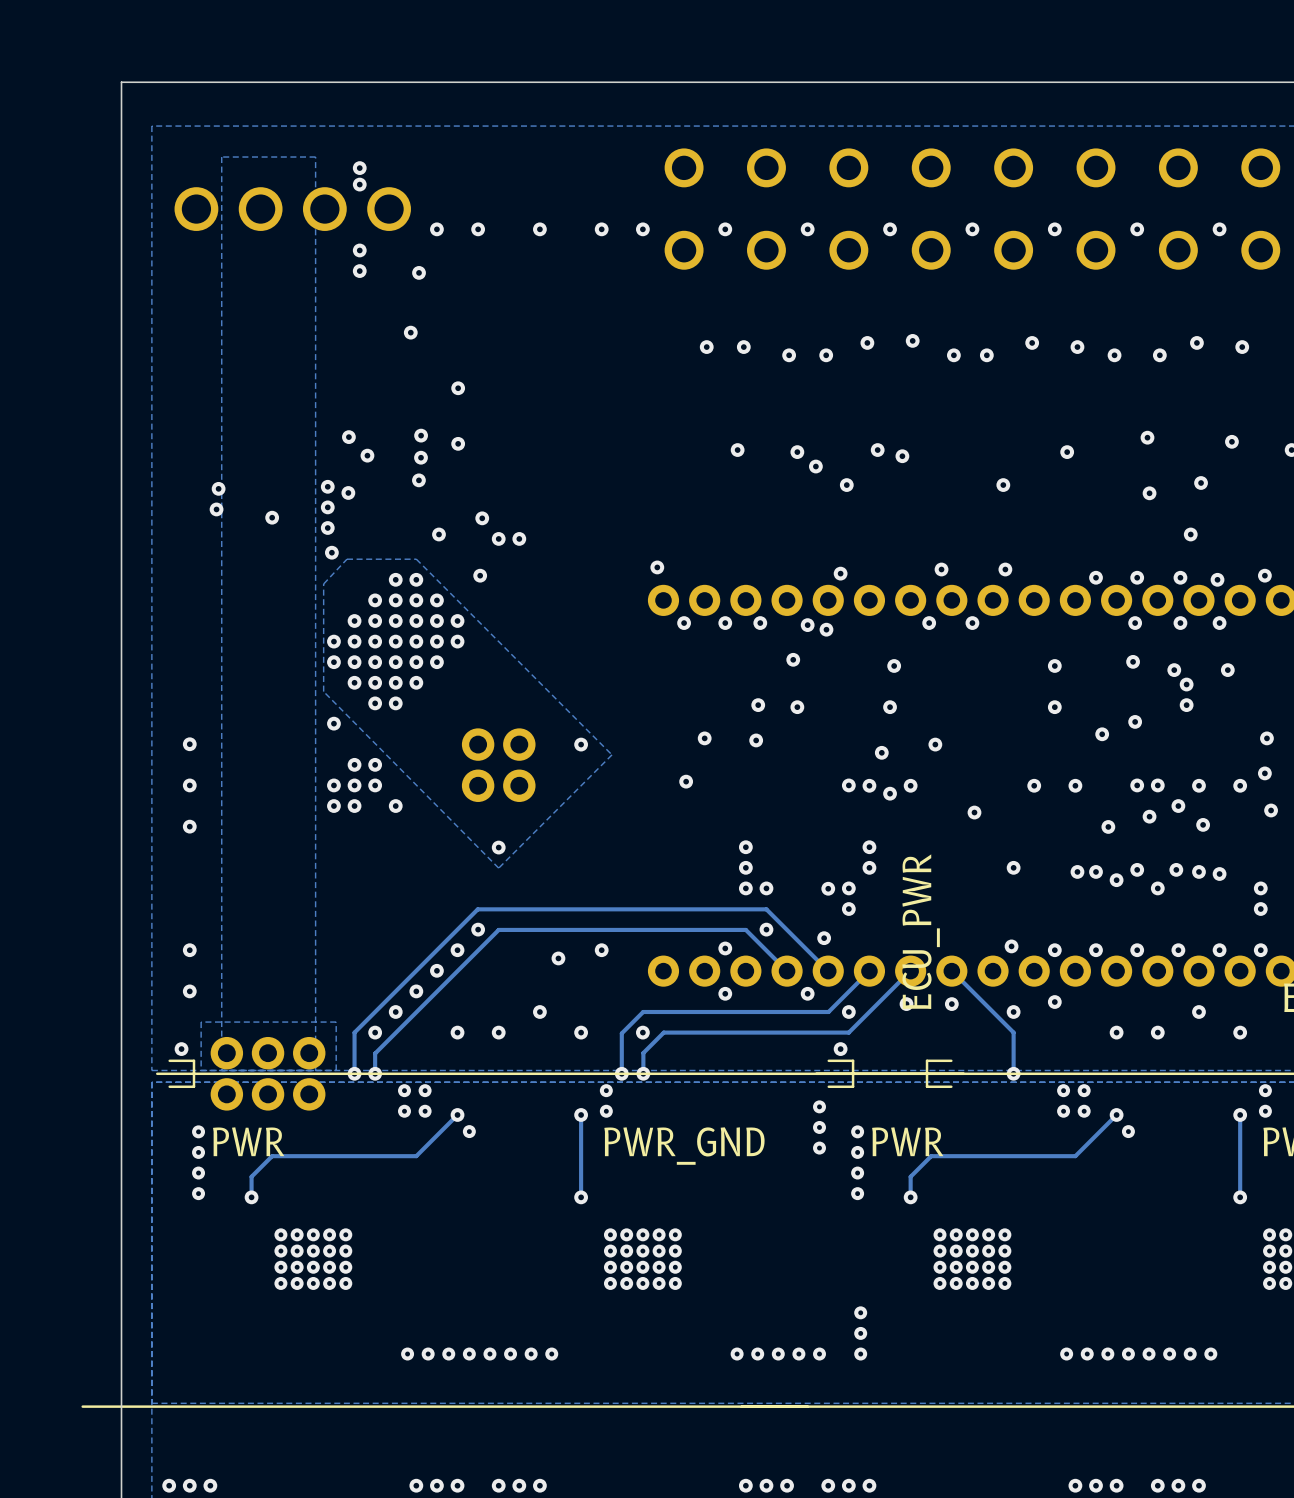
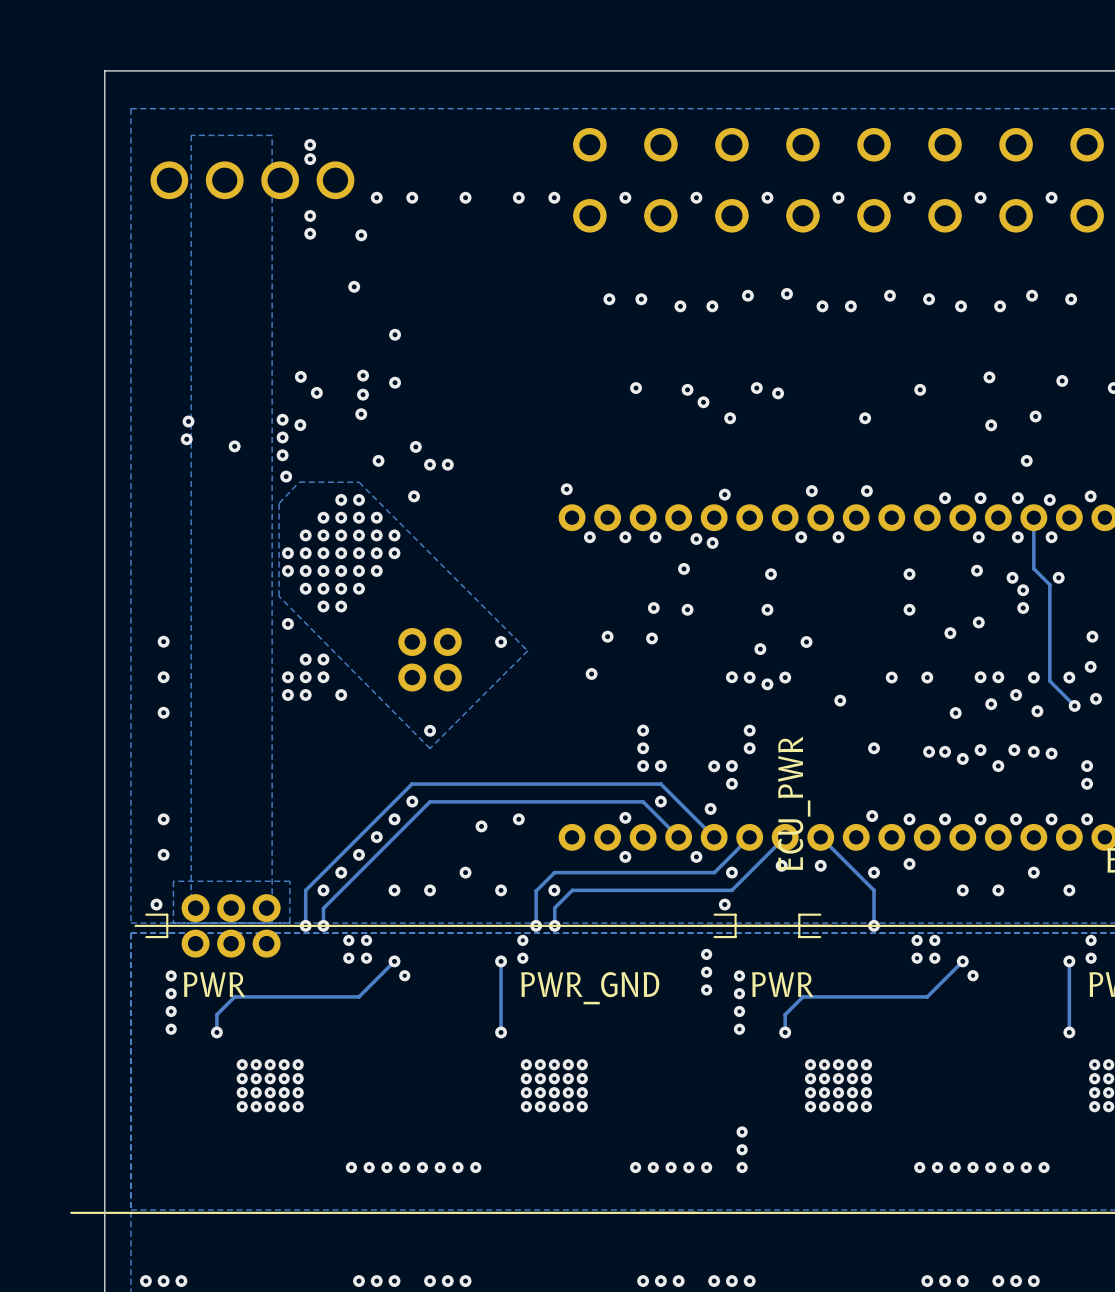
track: none -> (1033, 517) (1033, 568) (1049, 584) (1049, 681) (1074, 705)
via: none -> (1074, 705)

